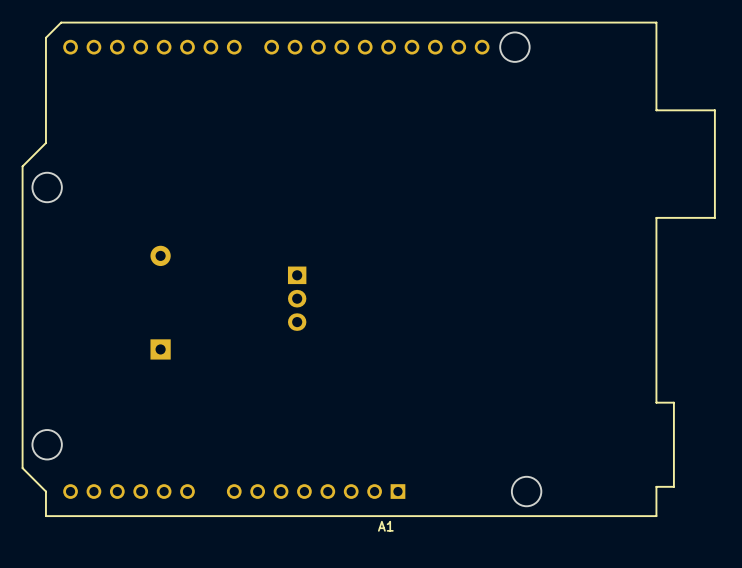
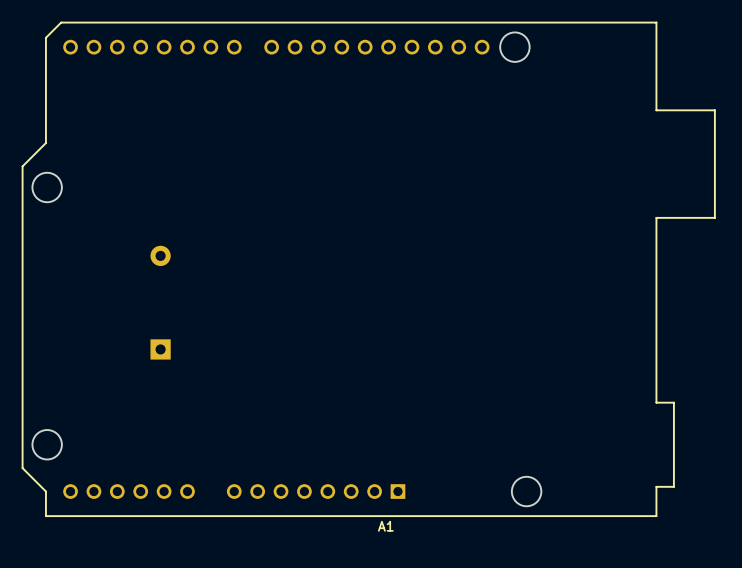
part: (297, 298) -> none

